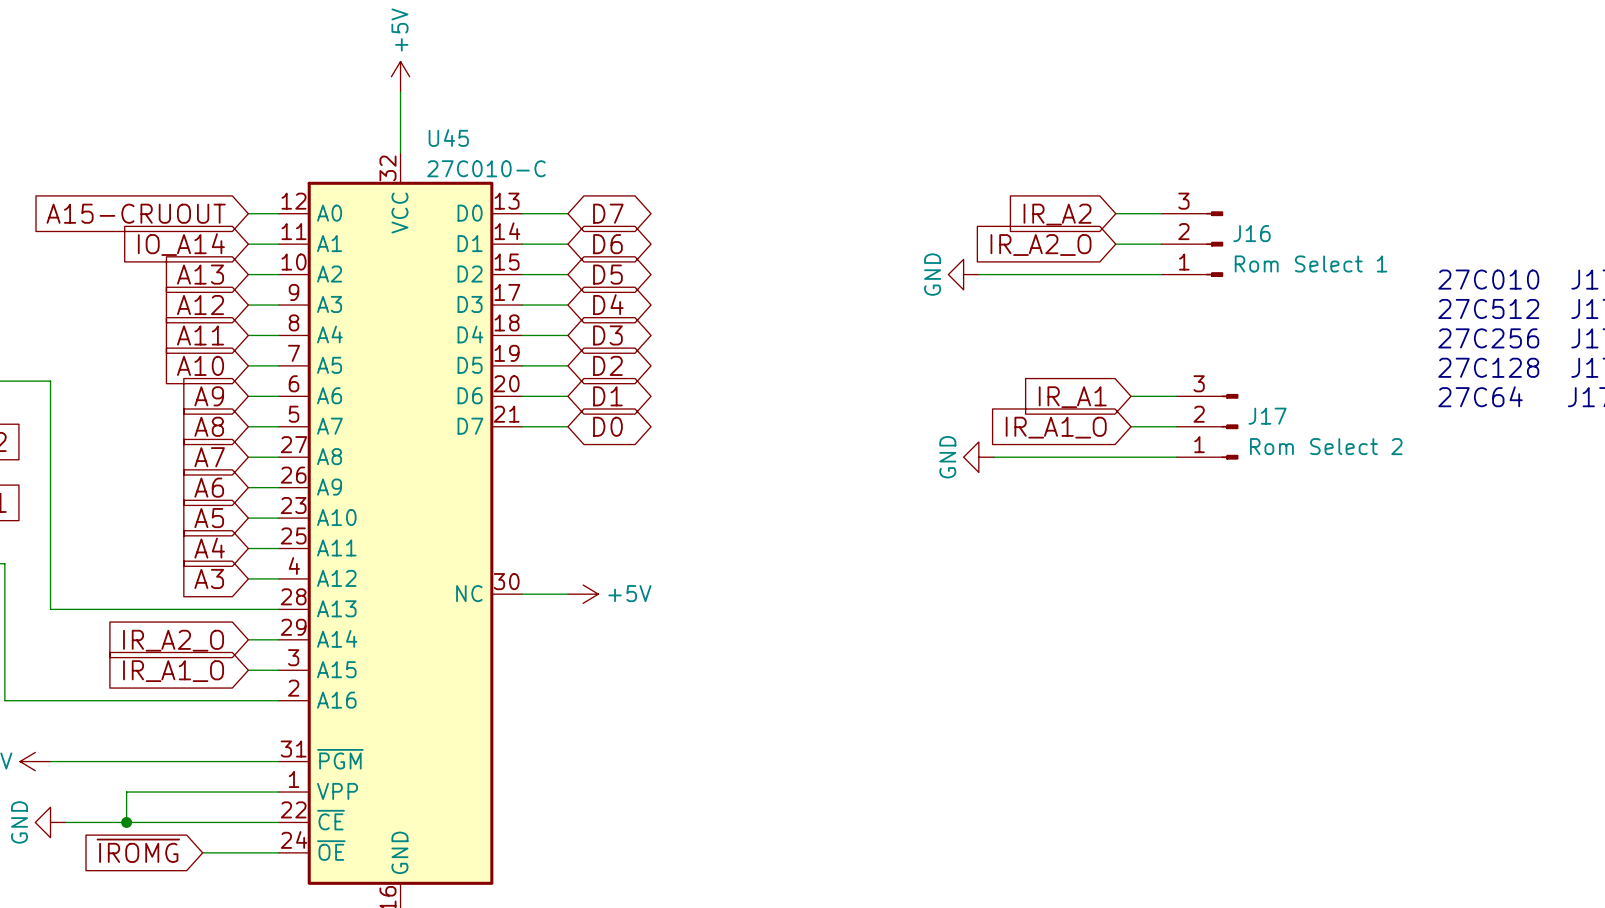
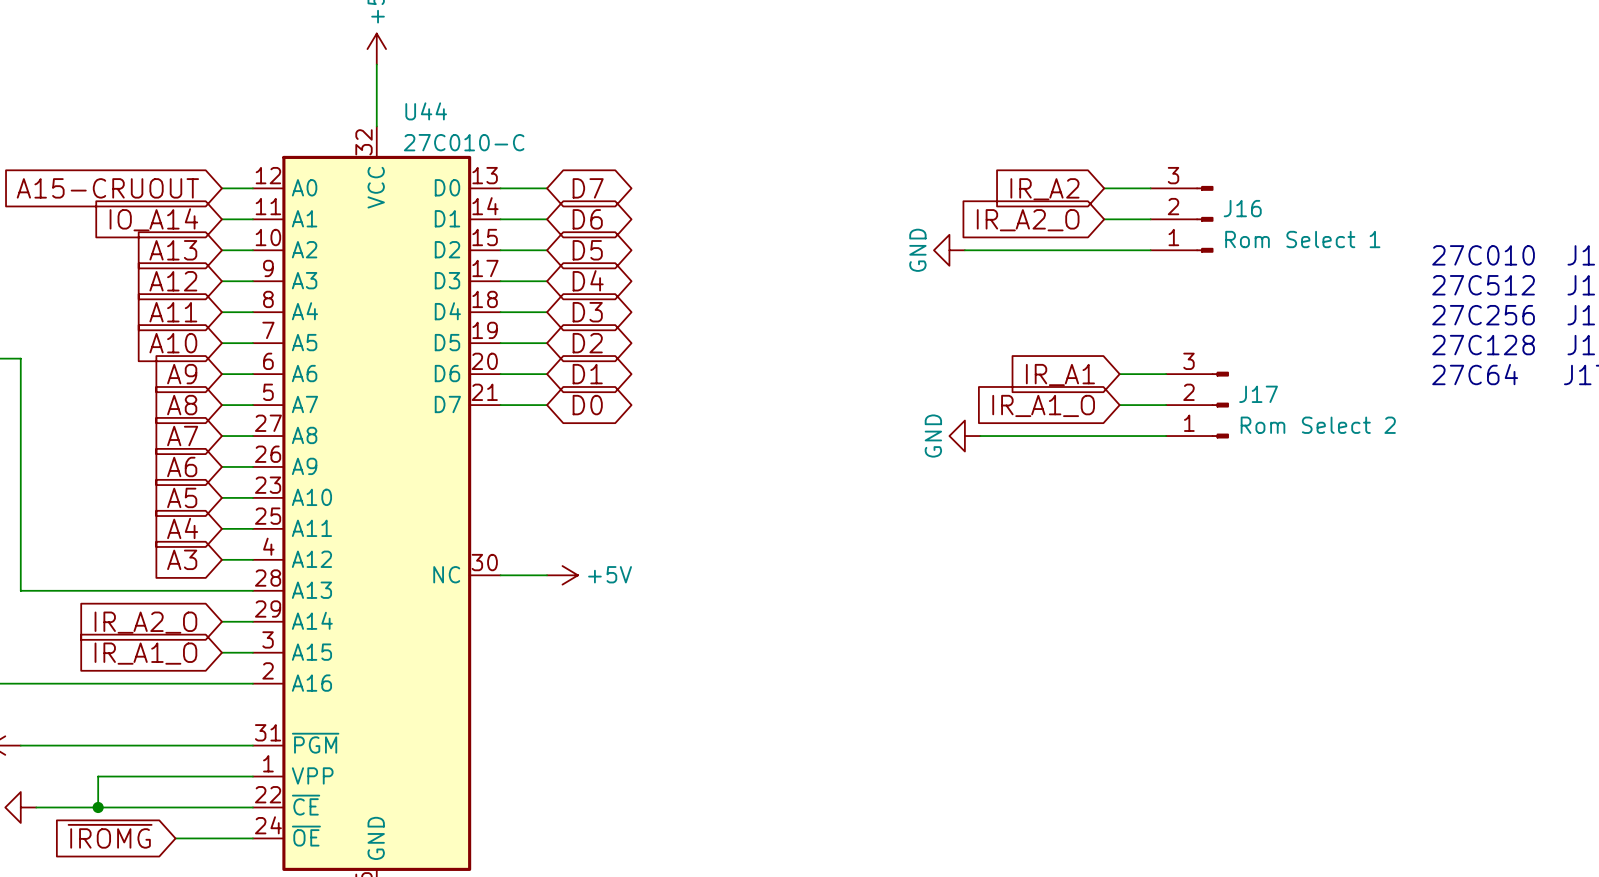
U45 name: U45 (448, 138) -> U44 (426, 111)

